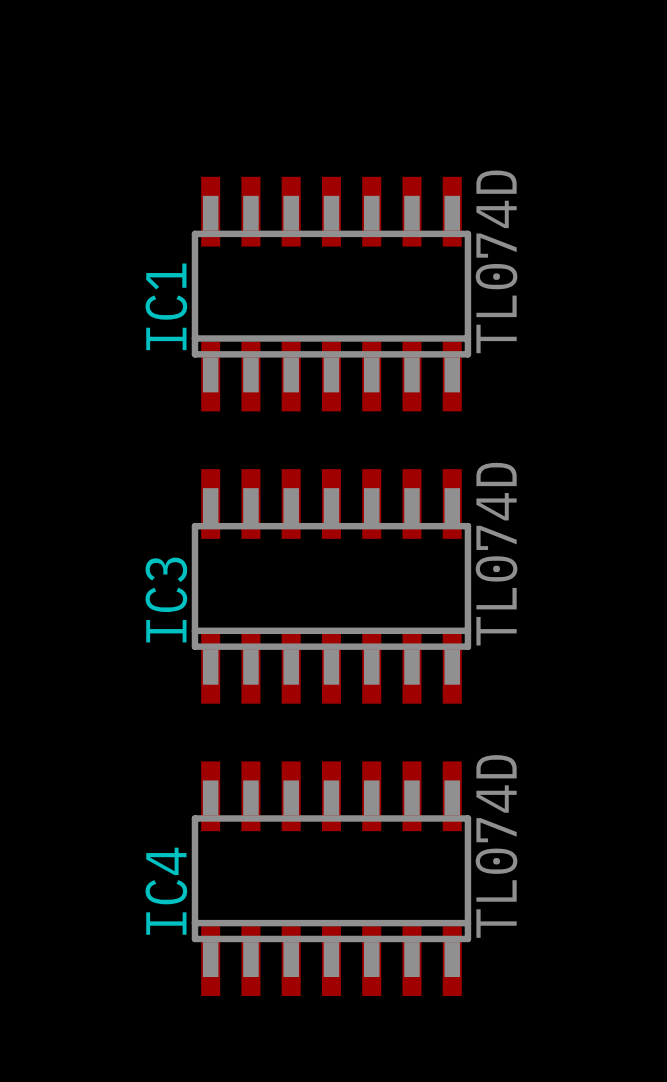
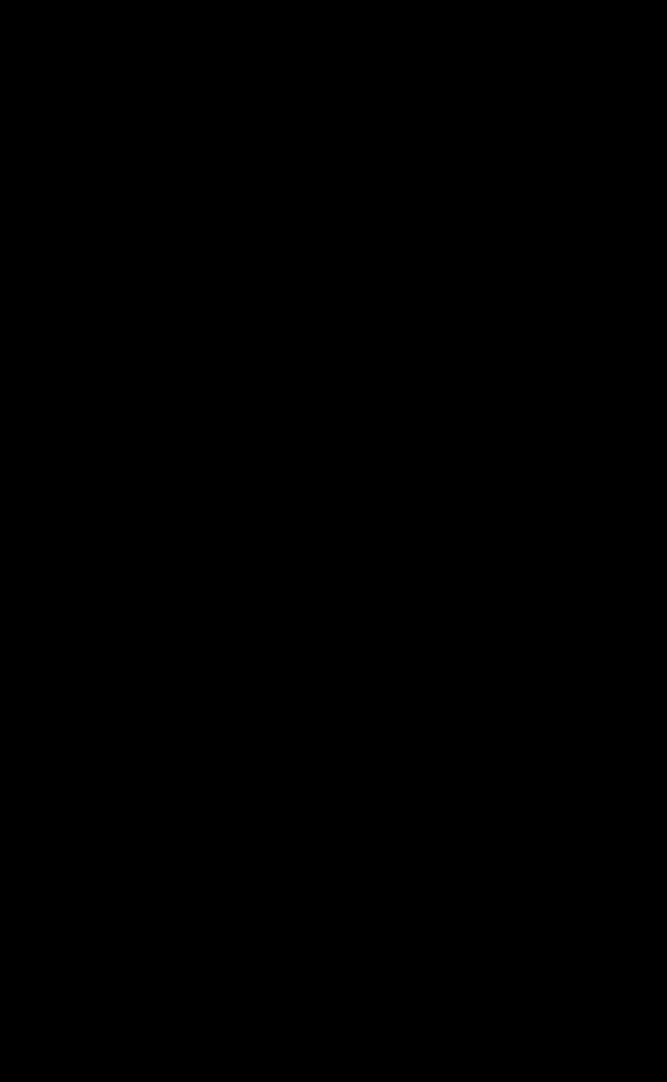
IC1: TL074D (331, 294) -> none
IC3: TL074D (331, 586) -> none
IC4: TL074D (331, 878) -> none

